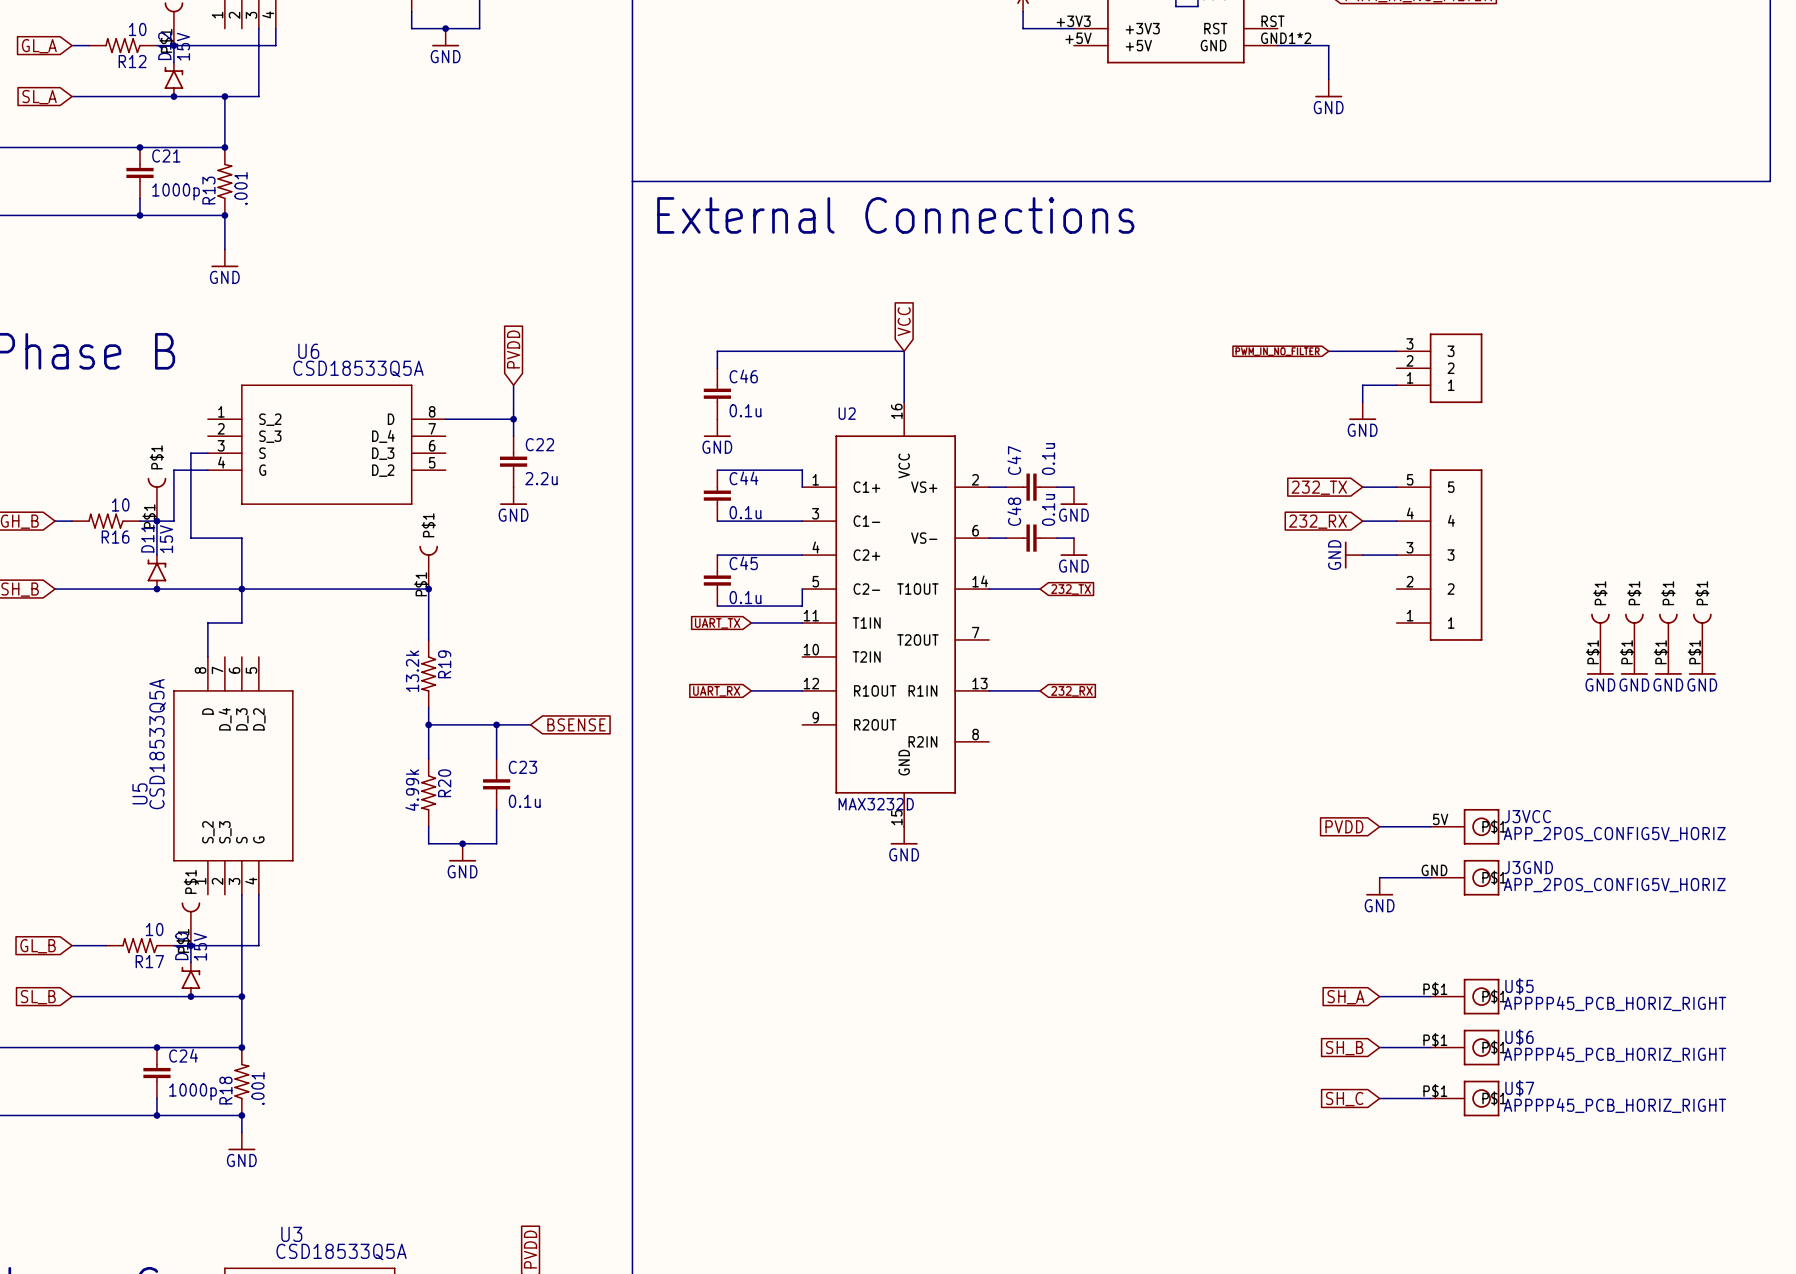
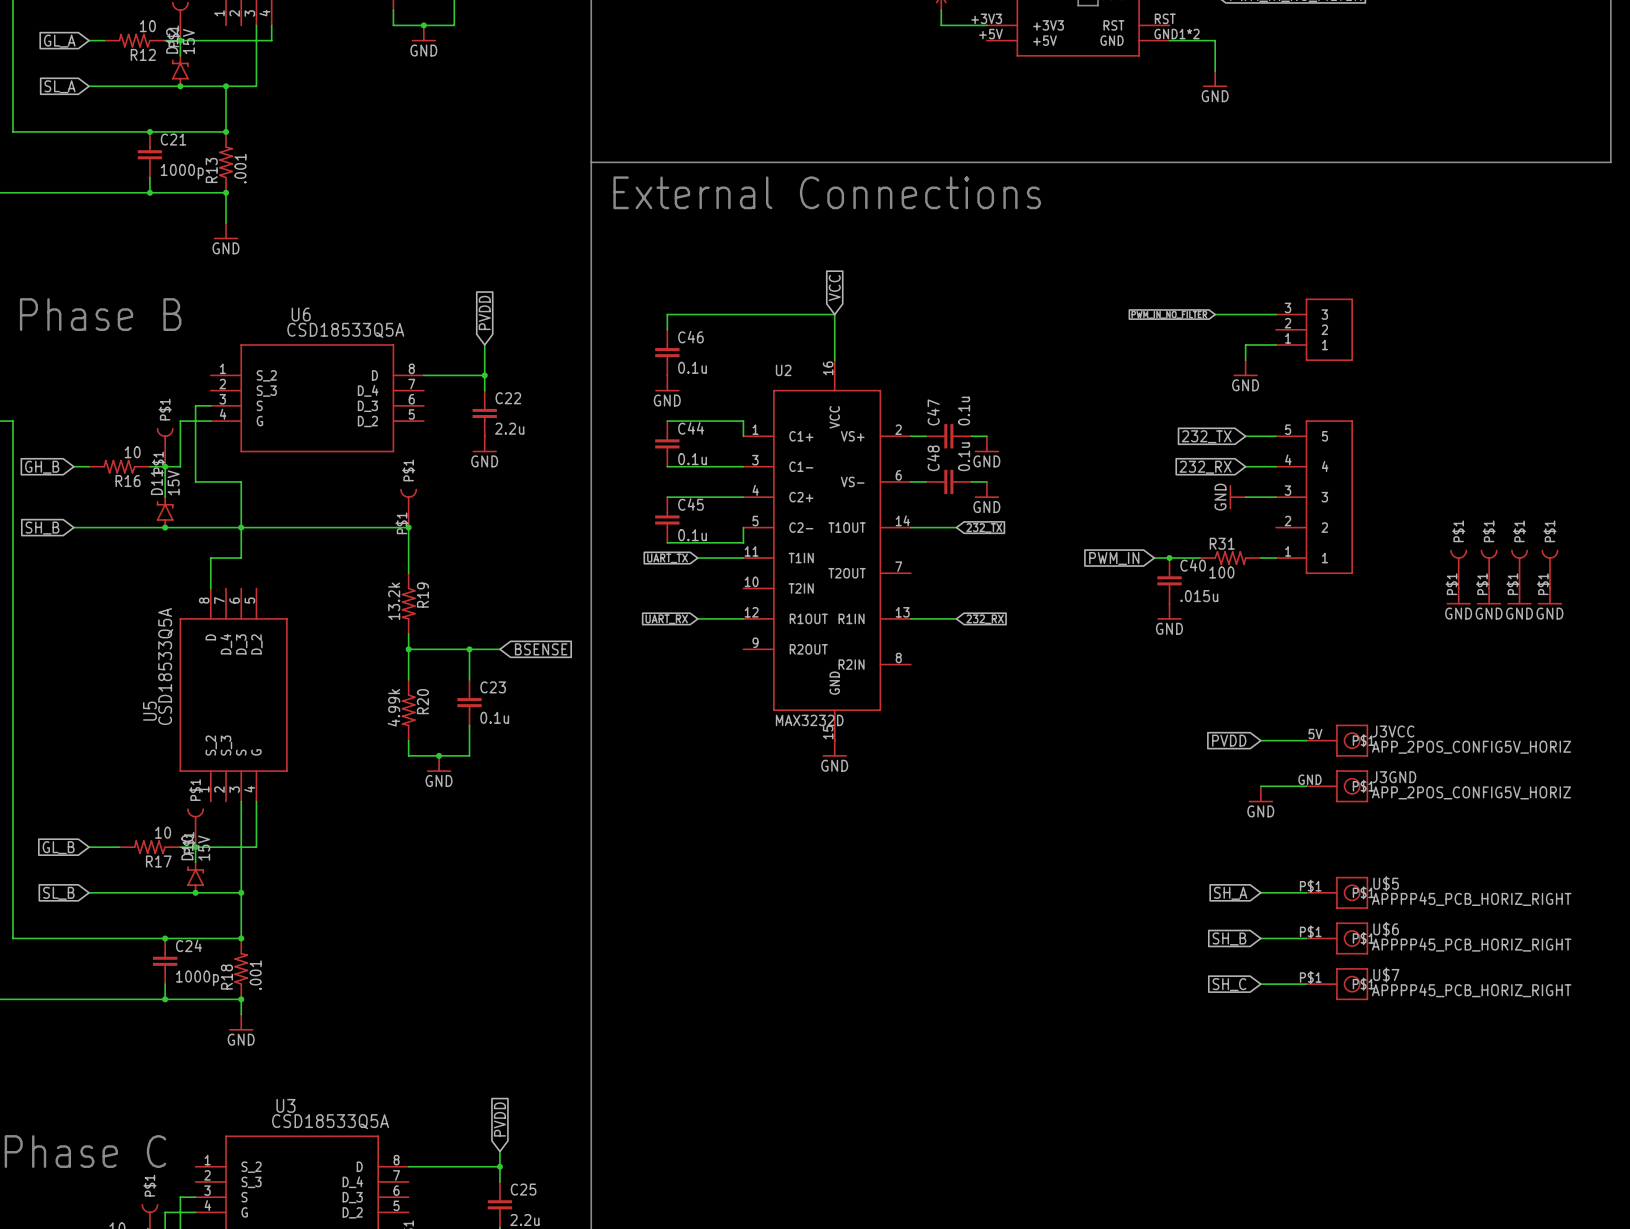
global label: none -> PWM_IN (1114, 558)
wire: none -> (1154, 558) (1199, 558)
junction: none -> (1169, 558)
R31: none -> 100 (1230, 558)
wire: none -> (1260, 558) (1276, 558)
C40: none -> .015u (1169, 580)
power symbol: none -> GND (1169, 611)

